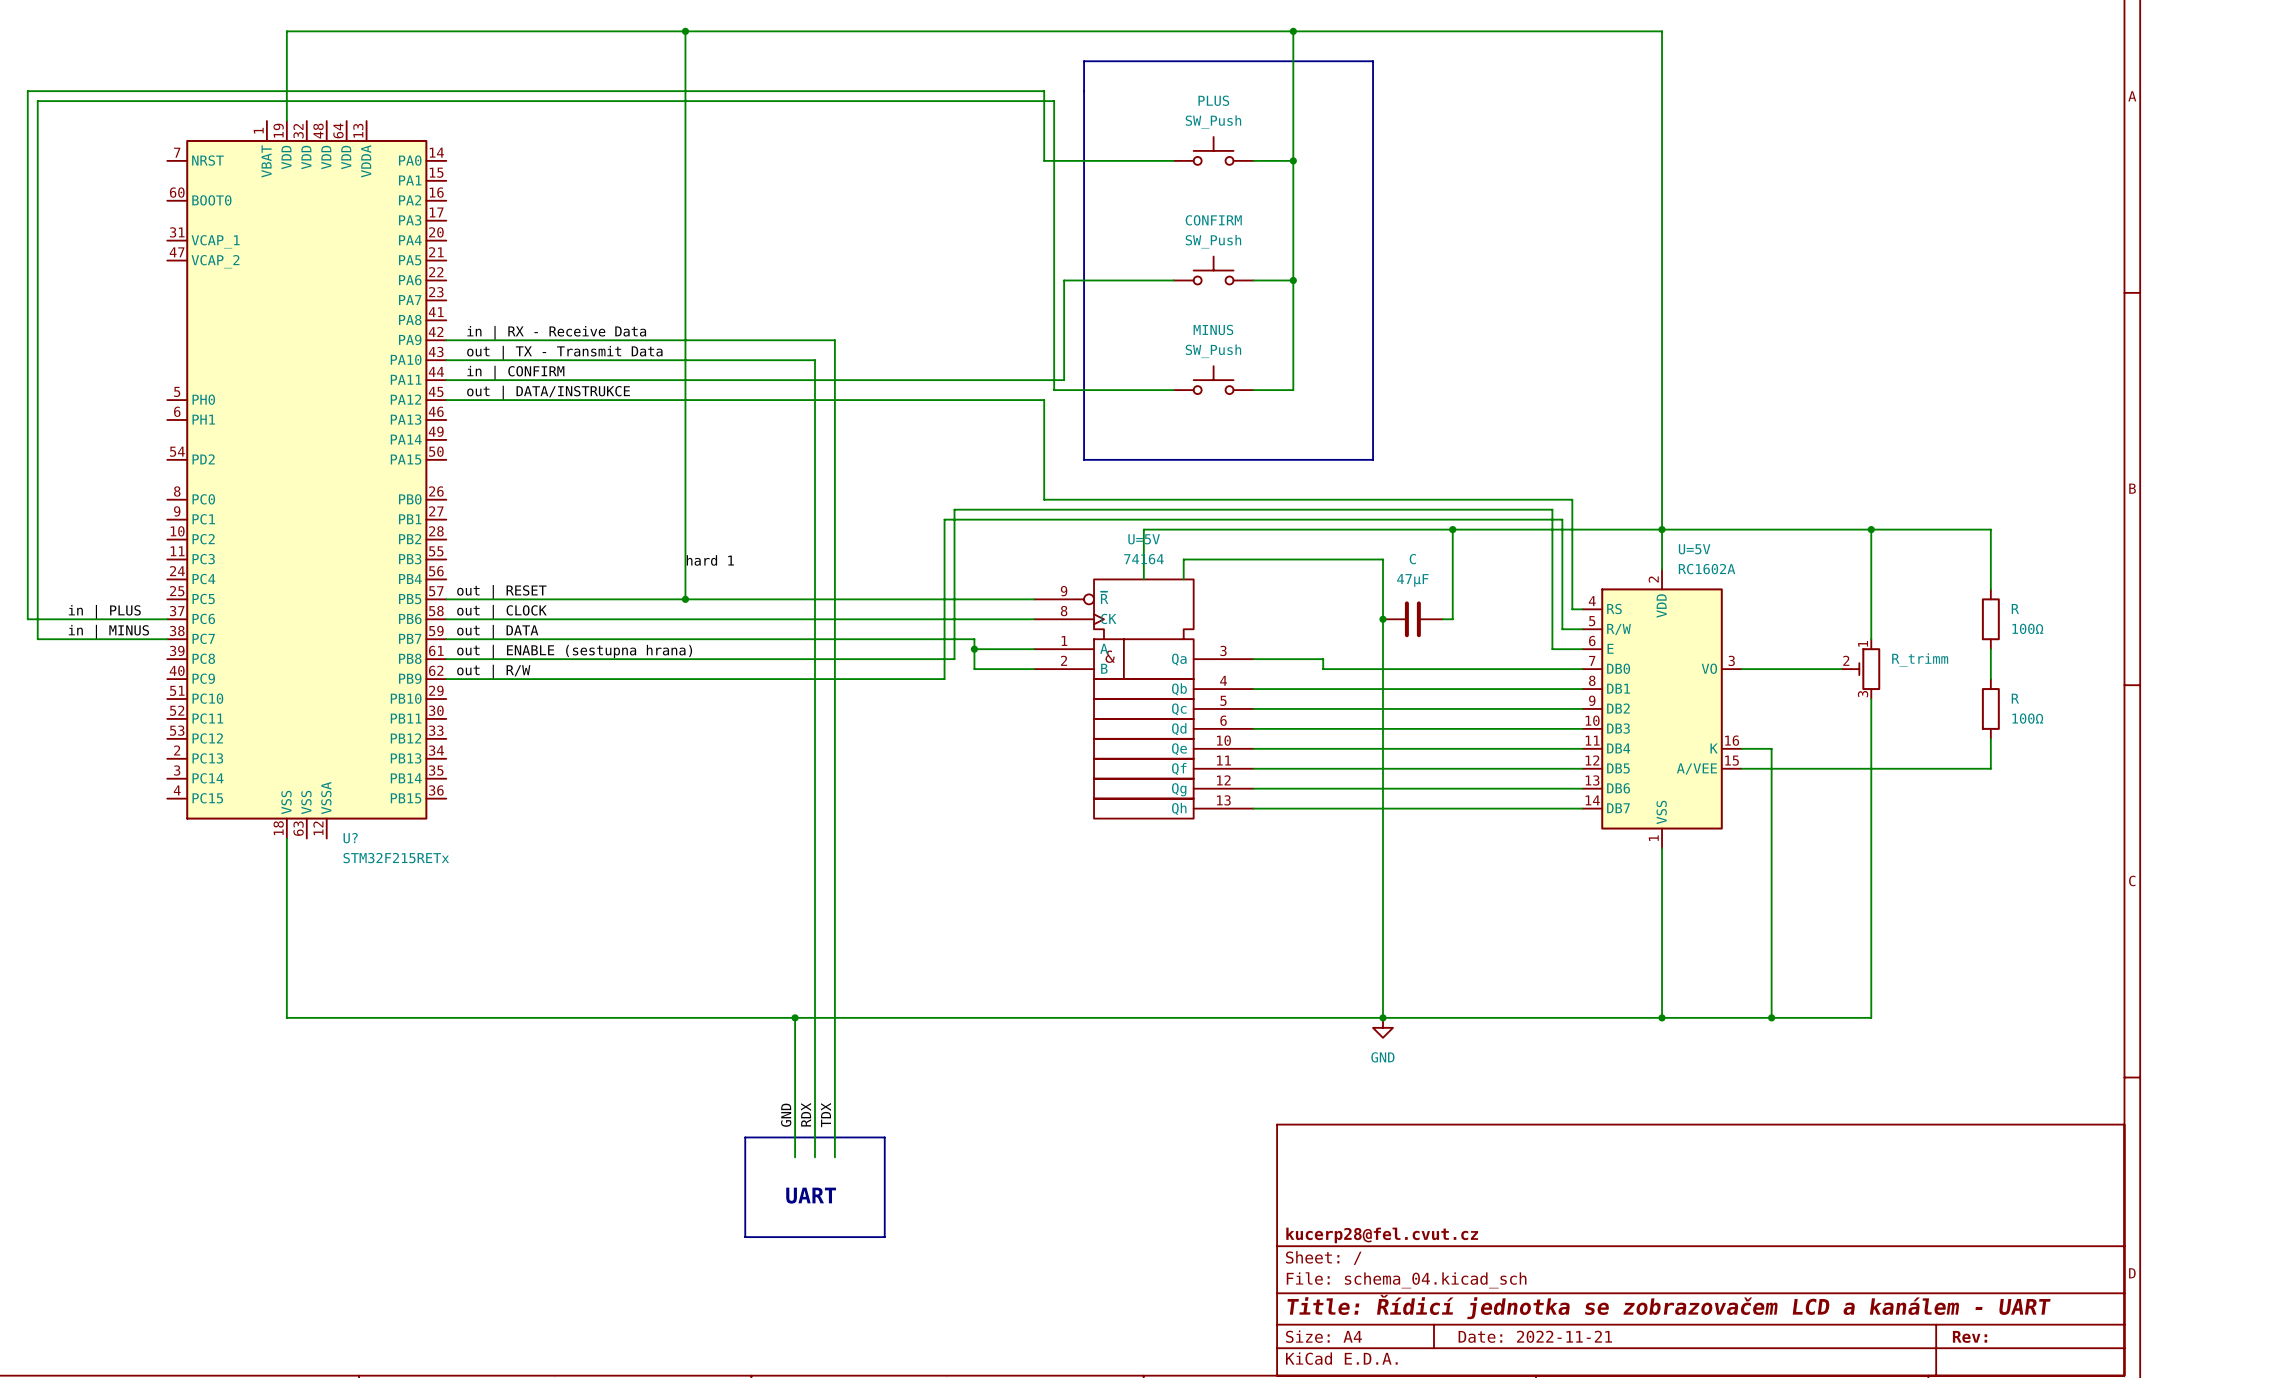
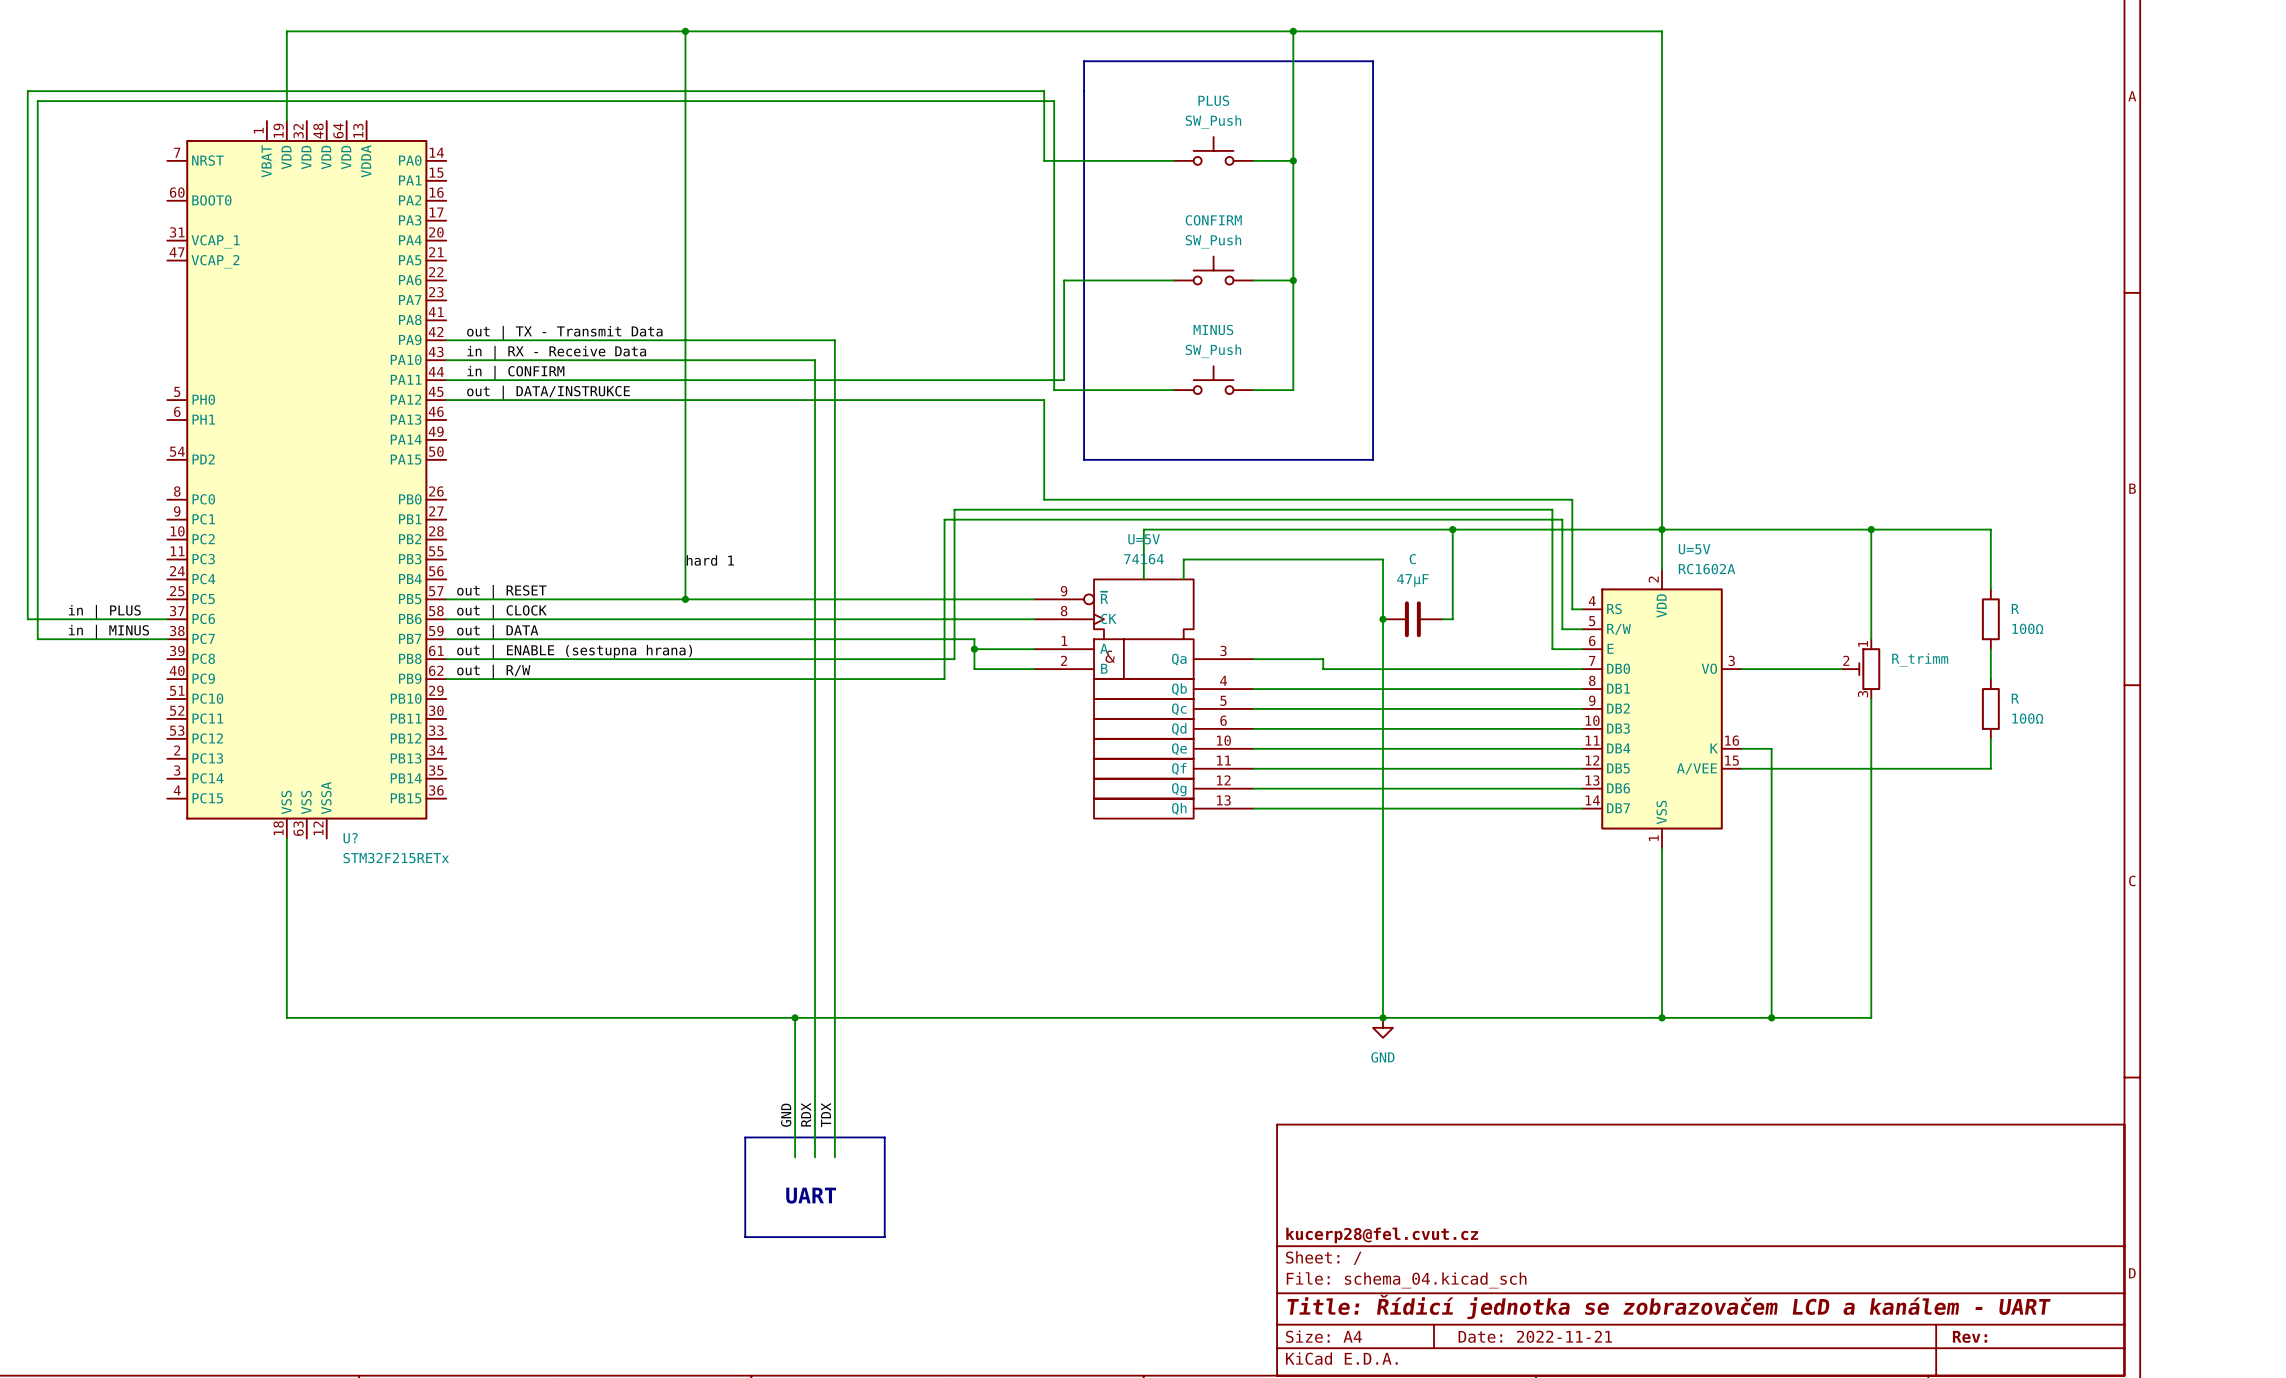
label: in | RX - Receive Data (556, 332) -> out | TX - Transmit Data (564, 332)
label: out | TX - Transmit Data (564, 352) -> in | RX - Receive Data (556, 352)

